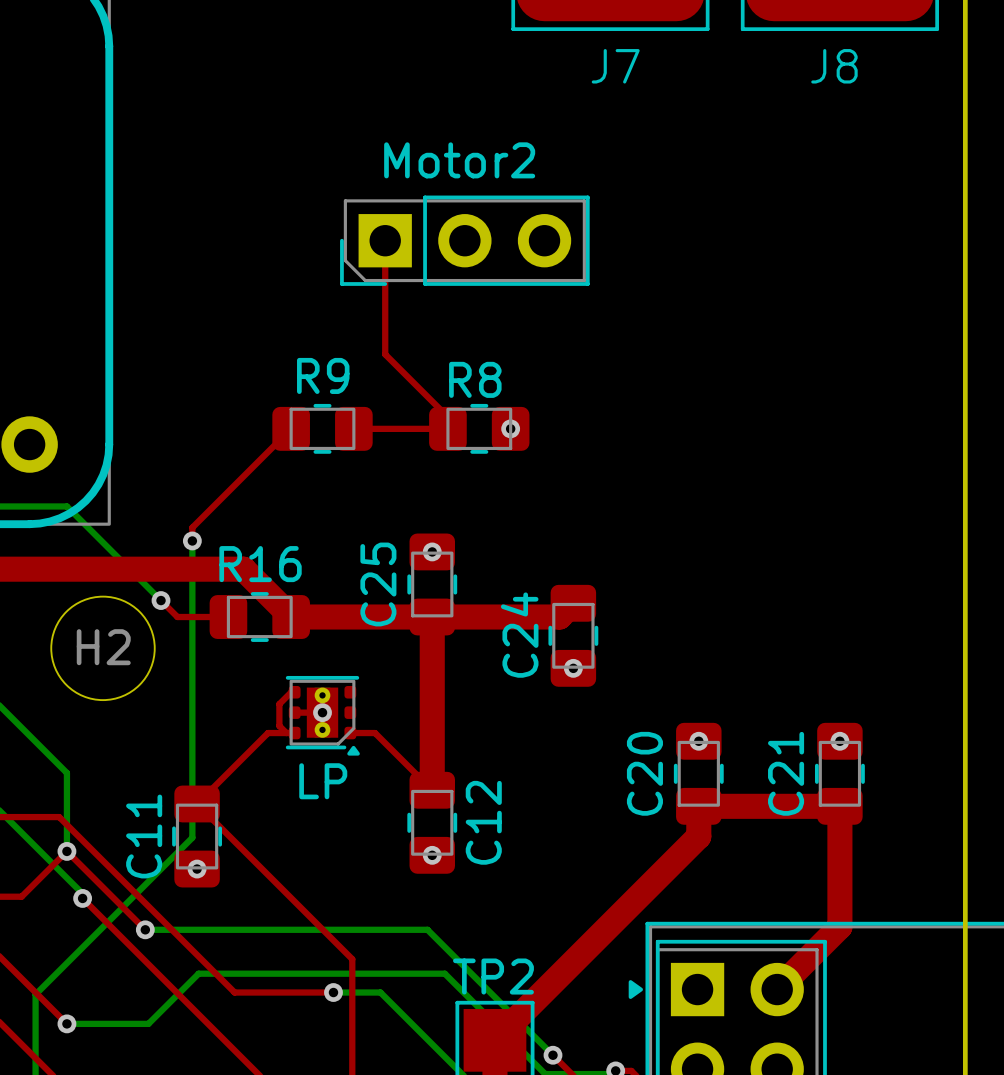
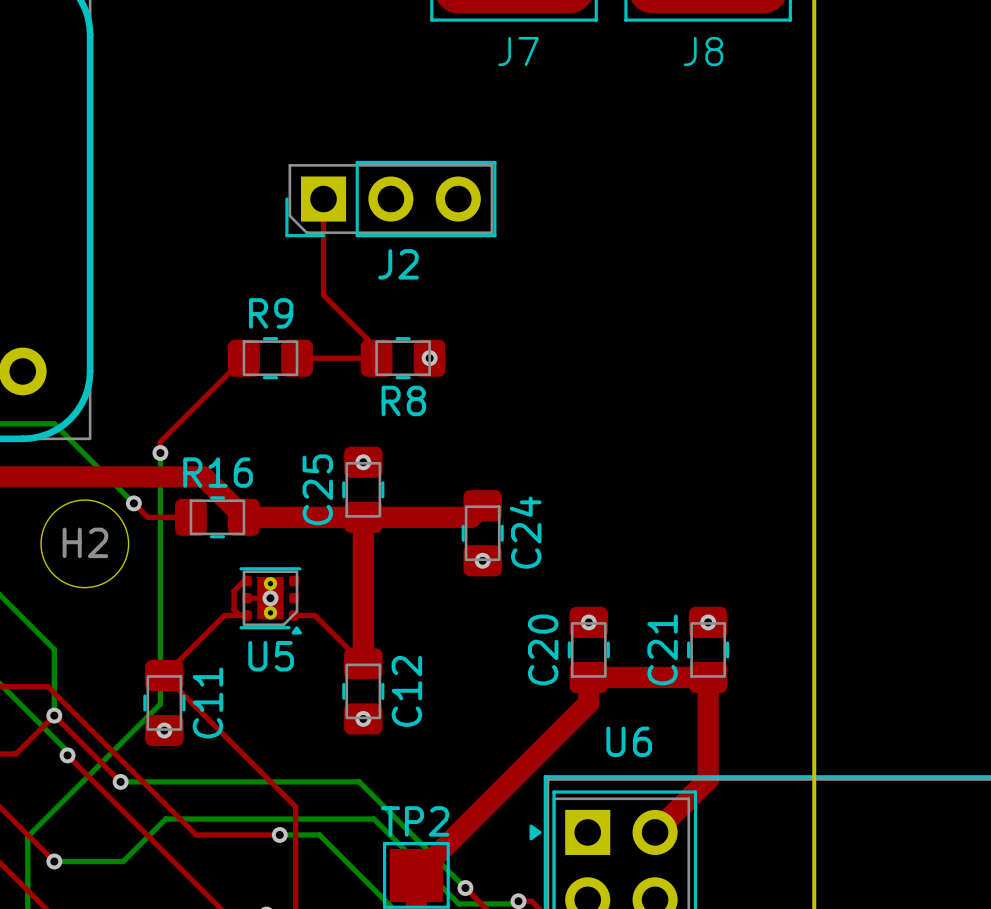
text: Motor2 (459, 160) -> none
J2 name: none -> J2 (398, 264)
R8 name position: R8 (475, 379) -> R8 (403, 400)
C24 name position: C24 (519, 635) -> C24 (525, 532)
U5 name: none -> U5 (271, 656)
text: LP (323, 781) -> none
C11 name position: C11 (144, 836) -> C11 (207, 703)
U6 name: none -> U6 (629, 741)

